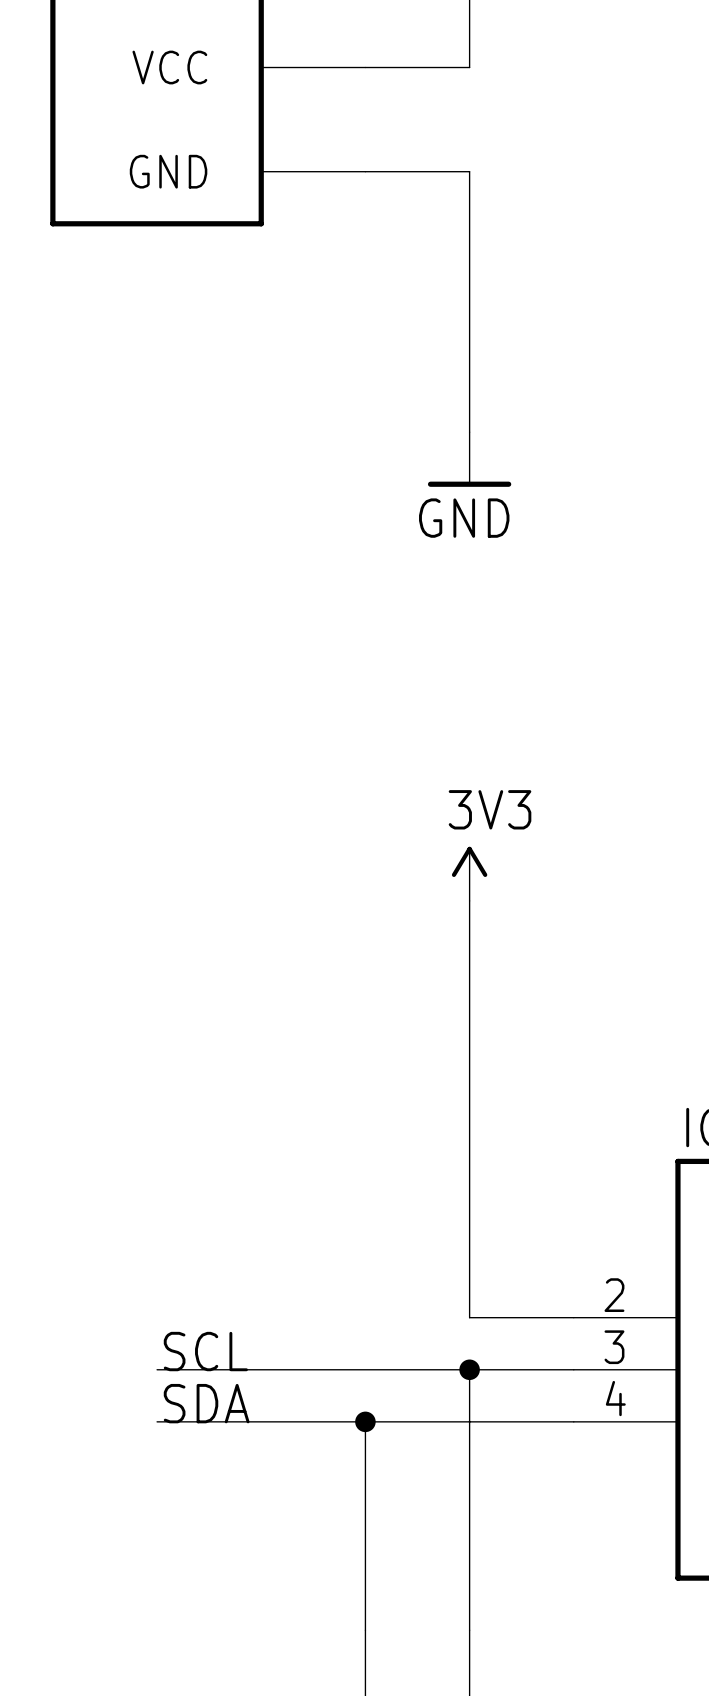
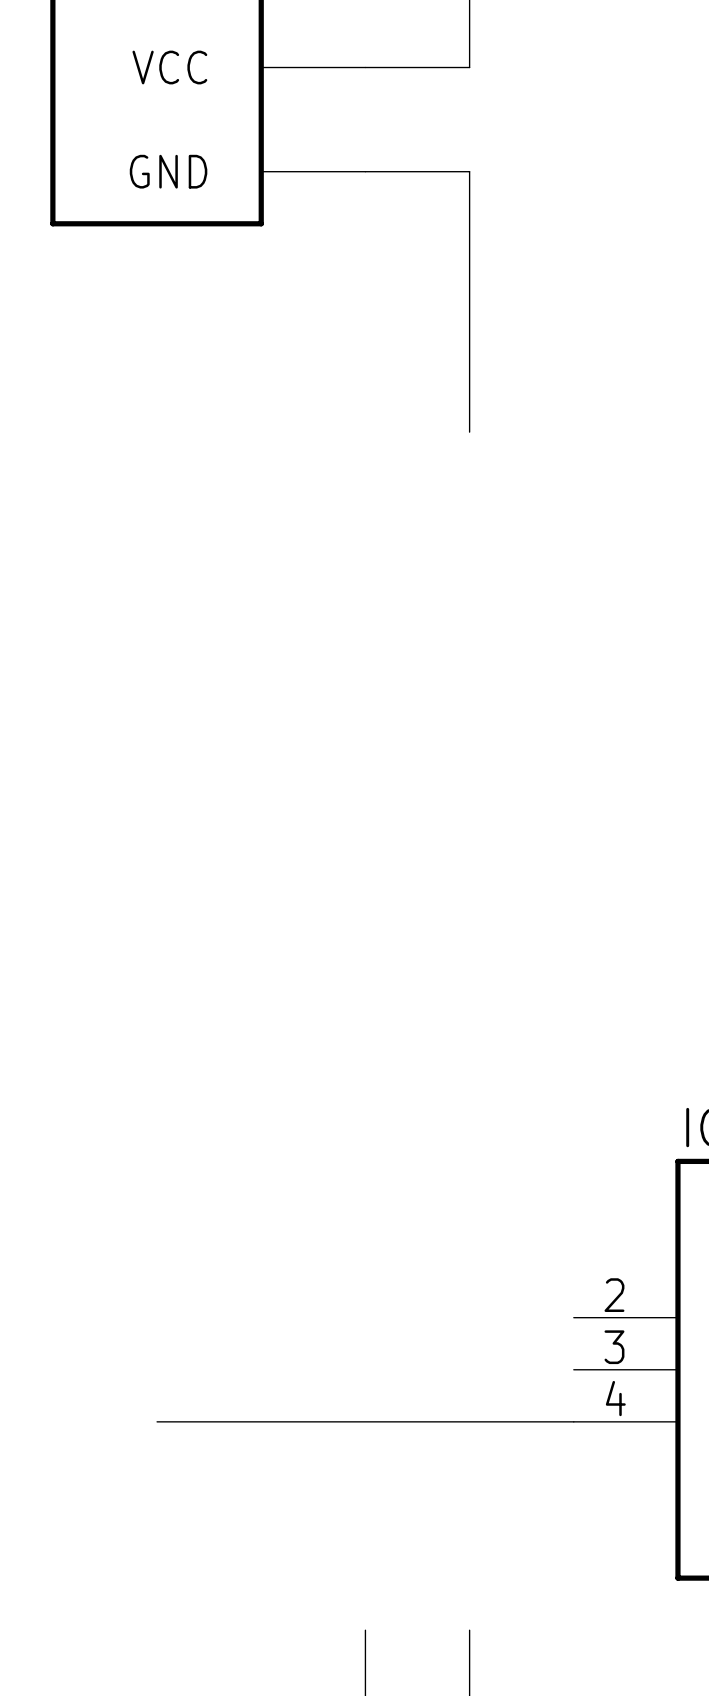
power symbol: GND (469, 459) -> none
power symbol: 3V3 (469, 873) -> none
wire: (469, 900) (469, 1317) (573, 1317) -> none
label: SCL (205, 1351) -> none
wire: (157, 1369) (573, 1369) -> none
wire: (469, 1369) (469, 1630) -> none
junction: (469, 1369) -> none
label: SDA (206, 1403) -> none
wire: (365, 1421) (365, 1630) -> none
junction: (365, 1421) -> none

